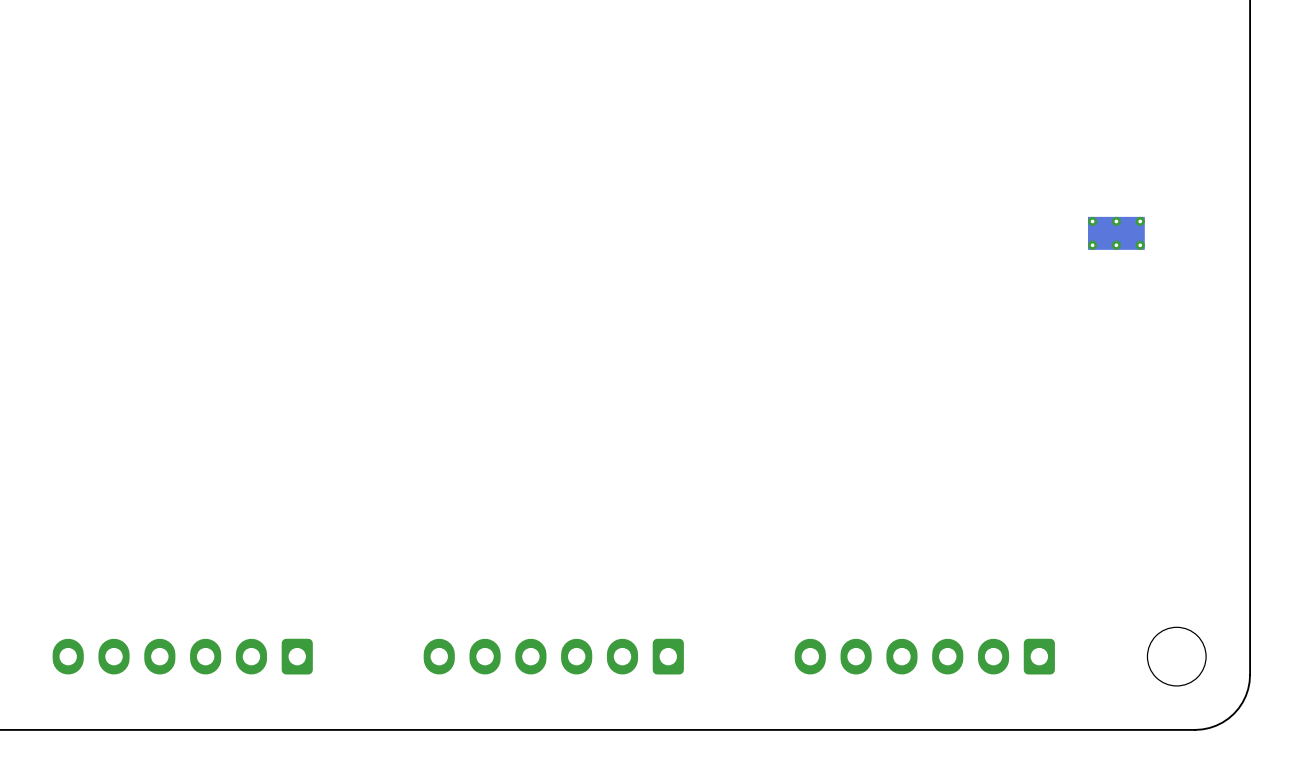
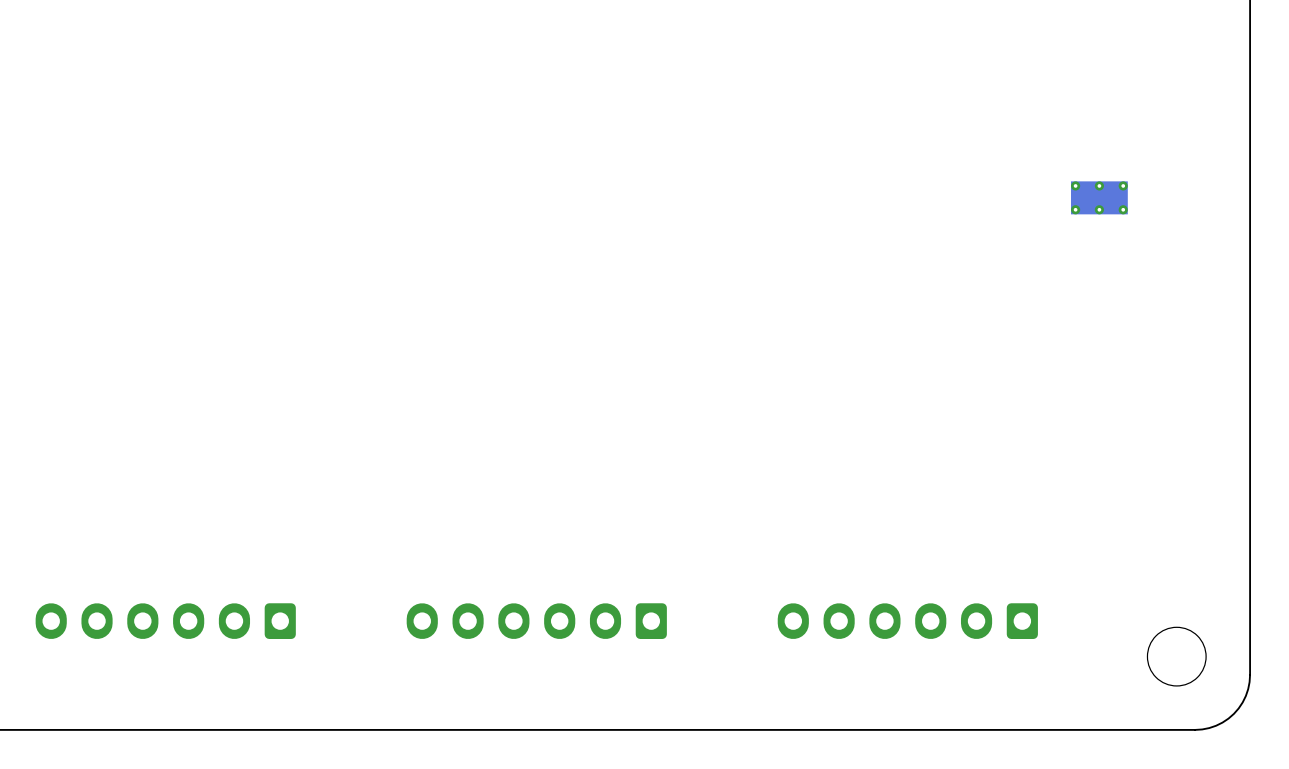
part position: (1116, 233) -> (1099, 197)
part position: (182, 656) -> (165, 621)
part position: (553, 656) -> (536, 621)
part position: (924, 656) -> (907, 621)

